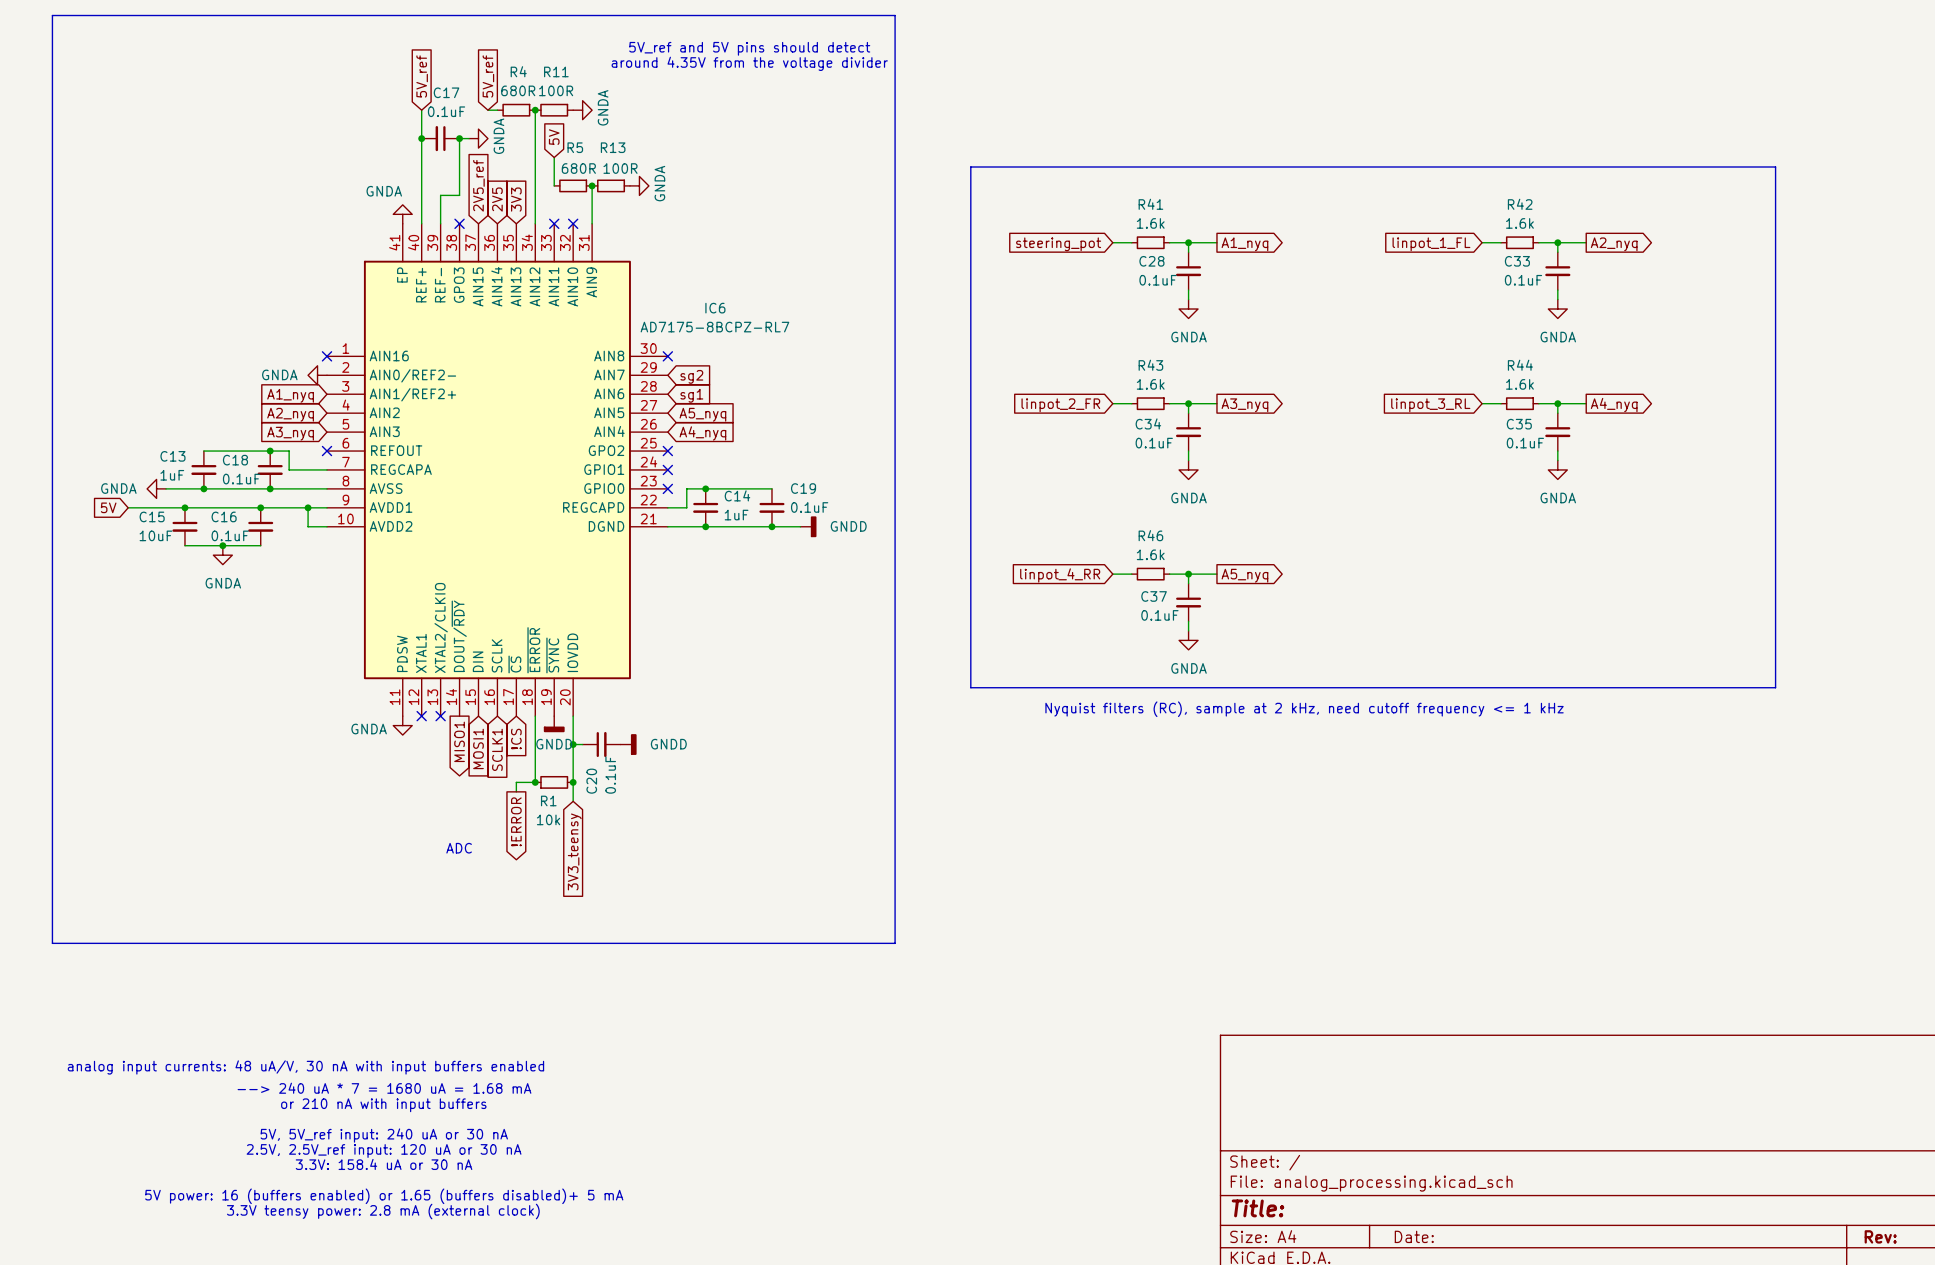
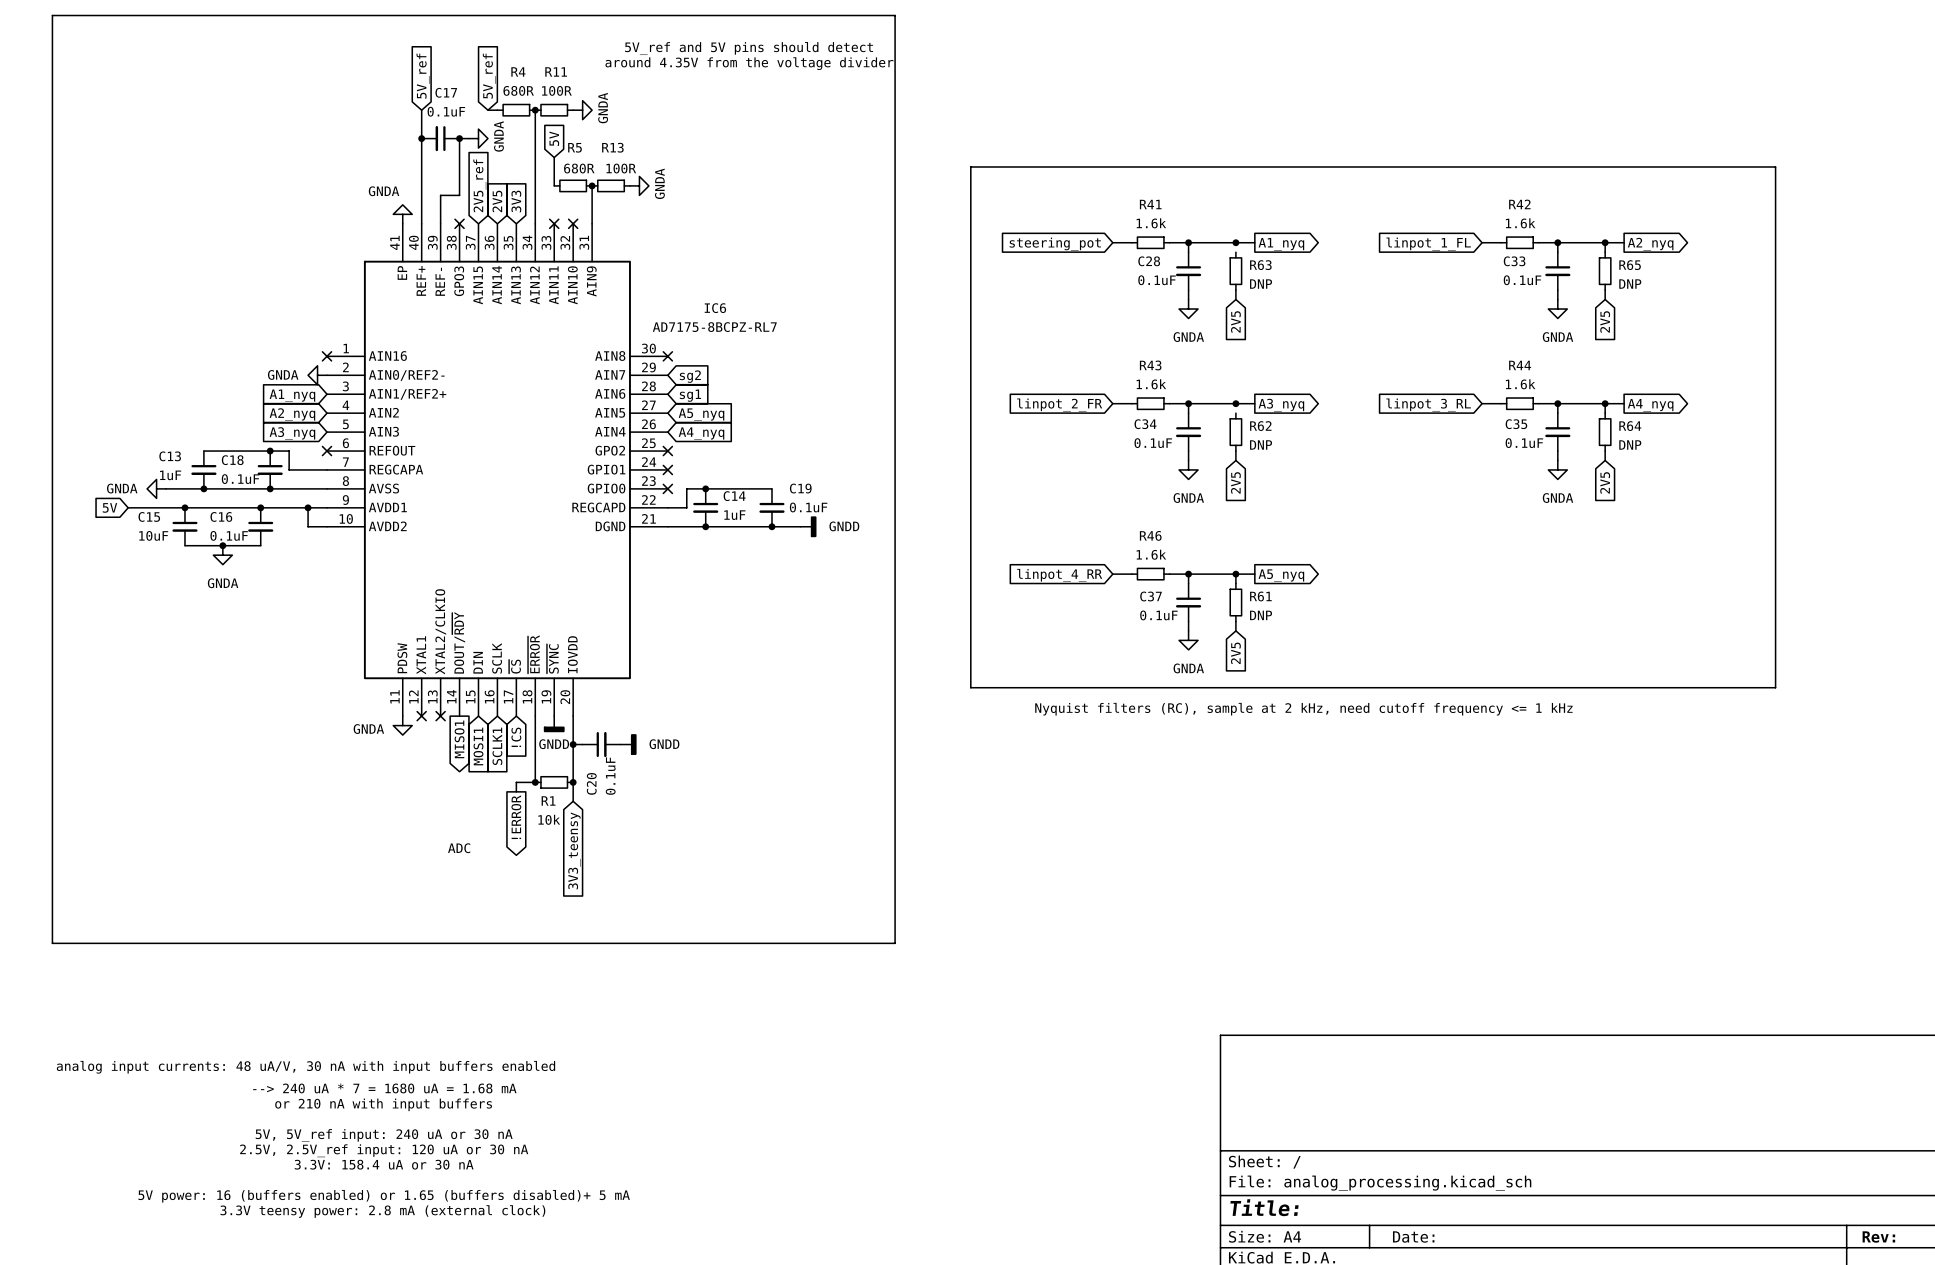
wire: none -> (1216, 242) (1254, 242)
junction: none -> (1235, 242)
wire: none -> (1586, 242) (1624, 242)
wire: none -> (1605, 242) (1605, 252)
junction: none -> (1605, 242)
global label position: A1_nyq (1244, 244) -> A1_nyq (1281, 244)
global label position: A2_nyq (1614, 244) -> A2_nyq (1650, 244)
R63: none -> DNP (1235, 271)
R65: none -> DNP (1605, 271)
wire: none -> (1235, 290) (1235, 299)
wire: none -> (1605, 290) (1605, 299)
global label: none -> 2V5 (1235, 321)
global label: none -> 2V5 (1605, 321)
wire: none -> (1216, 403) (1254, 403)
junction: none -> (1235, 403)
wire: none -> (1586, 403) (1624, 403)
wire: none -> (1605, 403) (1605, 413)
junction: none -> (1605, 403)
global label position: A3_nyq (1244, 405) -> A3_nyq (1281, 405)
global label position: A4_nyq (1614, 405) -> A4_nyq (1650, 405)
R62: none -> DNP (1235, 432)
R64: none -> DNP (1605, 432)
wire: none -> (1235, 451) (1235, 460)
wire: none -> (1605, 451) (1605, 460)
global label: none -> 2V5 (1235, 482)
global label: none -> 2V5 (1605, 482)
wire: none -> (1216, 574) (1254, 574)
wire: none -> (1235, 574) (1235, 583)
junction: none -> (1235, 574)
global label position: A5_nyq (1244, 575) -> A5_nyq (1281, 575)
R61: none -> DNP (1235, 602)
wire: none -> (1235, 621) (1235, 630)
global label: none -> 2V5 (1235, 653)

